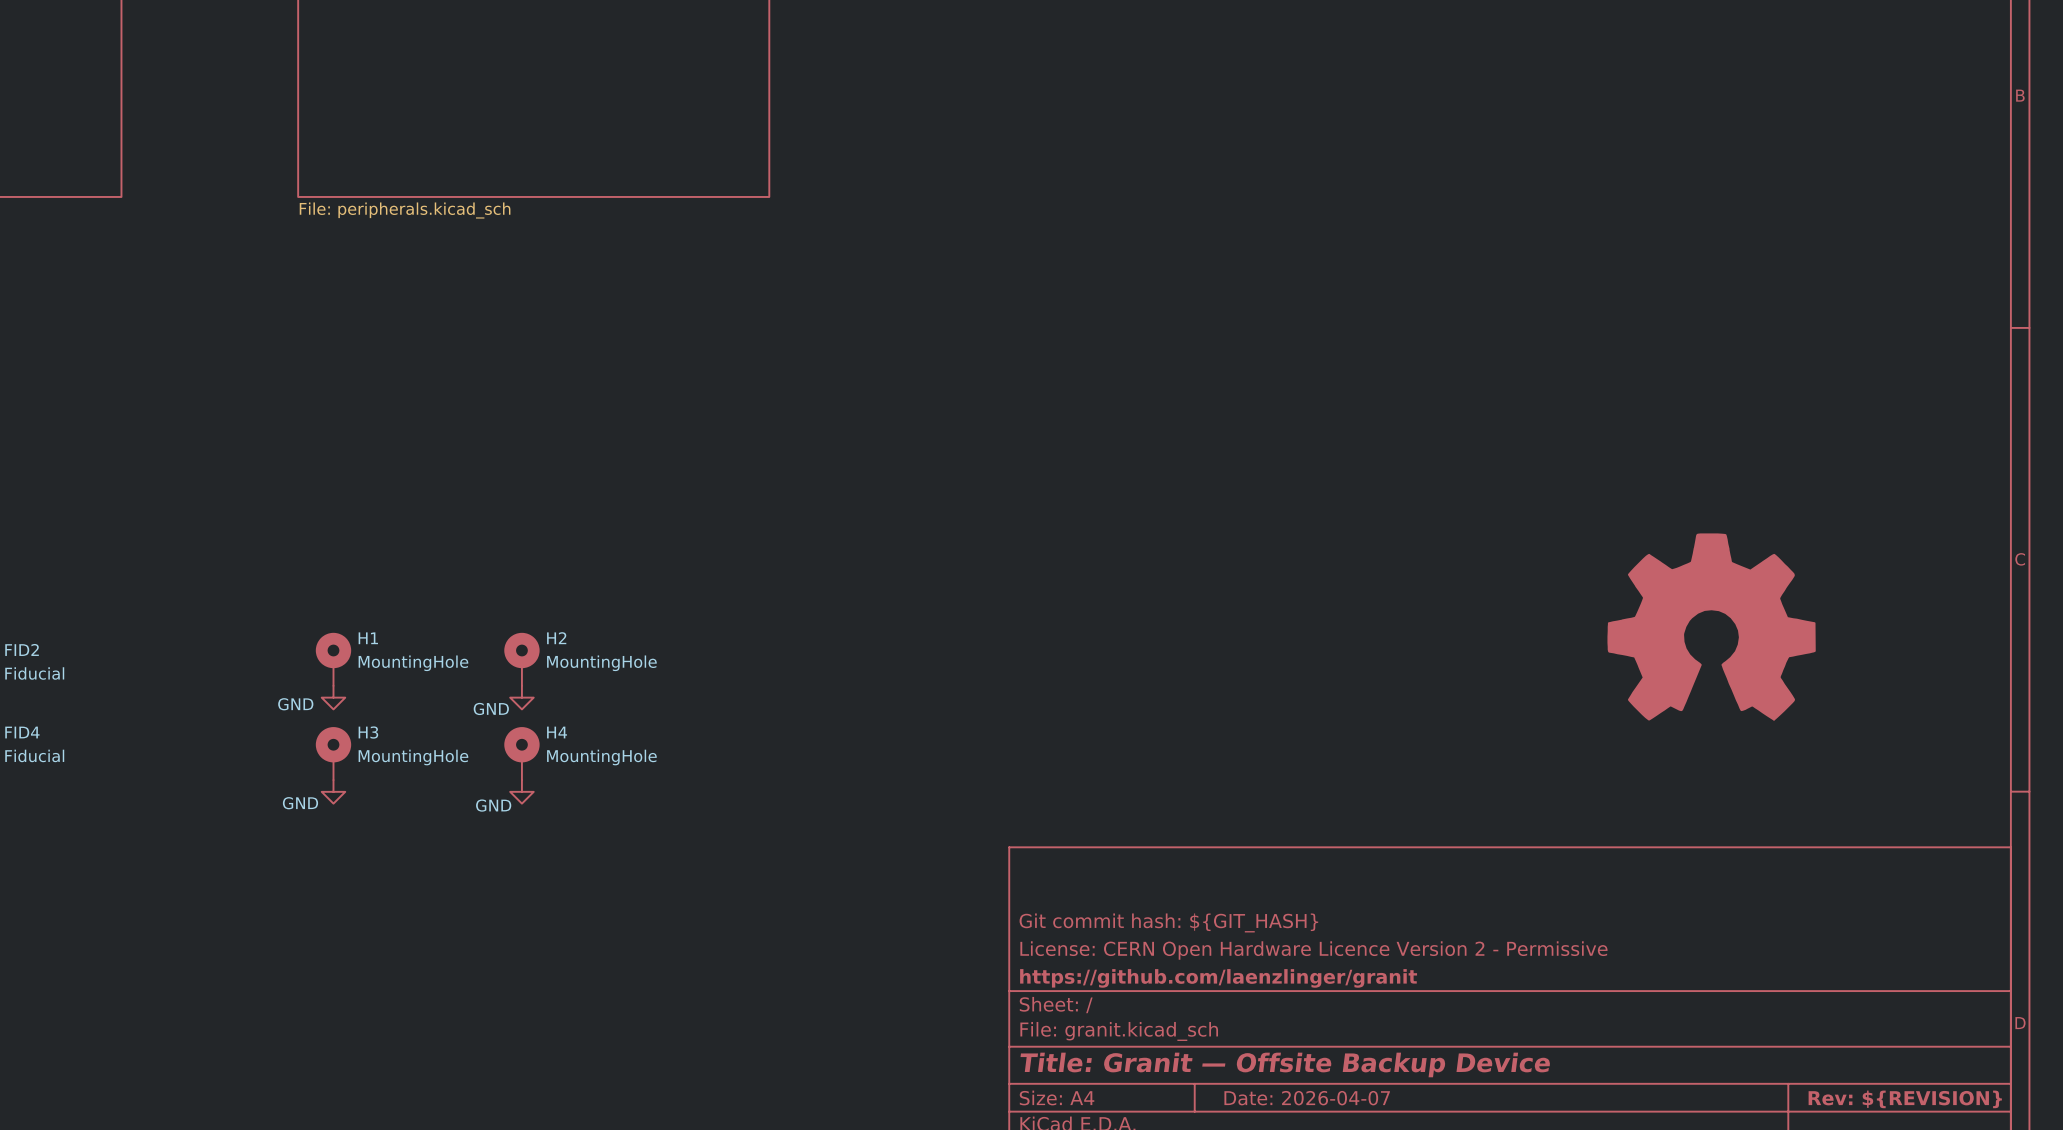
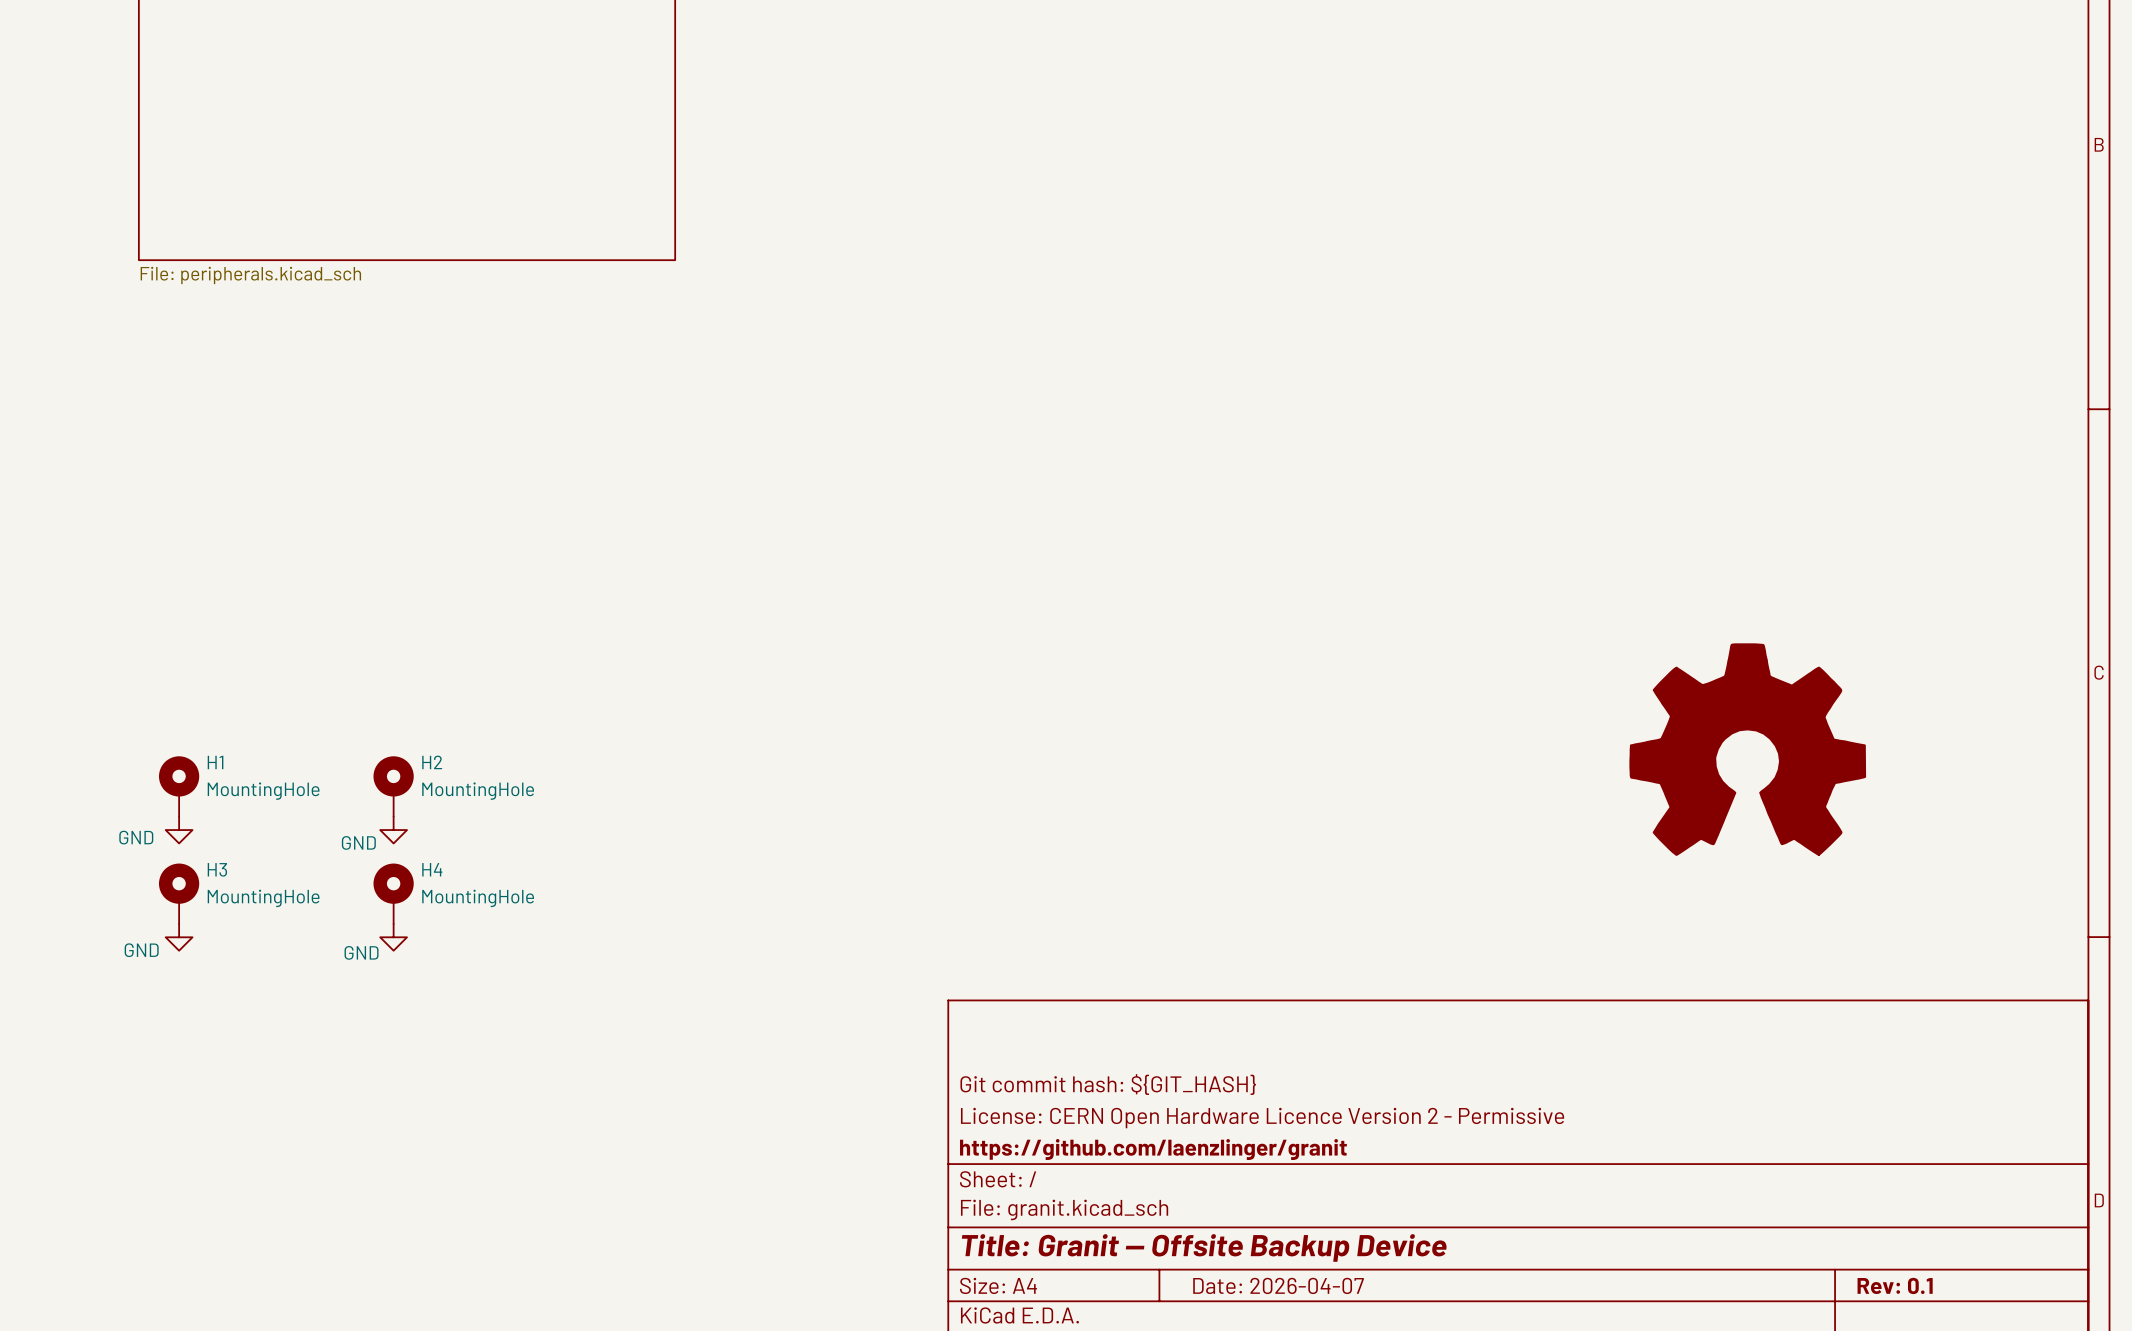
title block: Rev: ${REVISION} (1905, 1099) -> Rev: 0.1 (1895, 1285)

